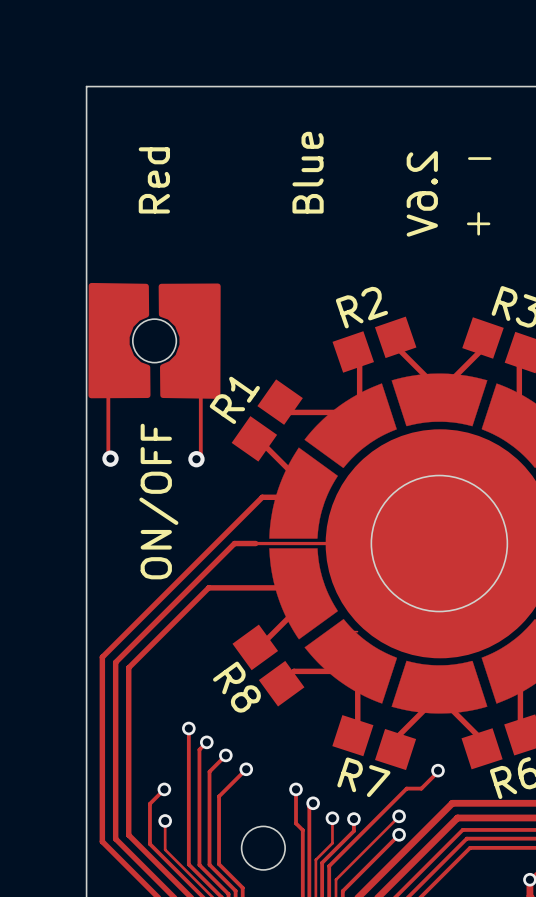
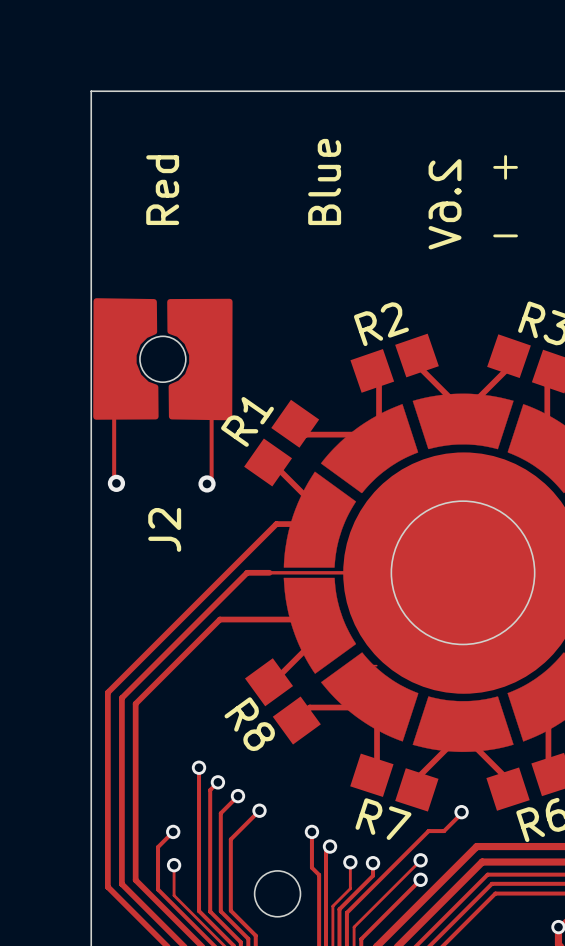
text: - (479, 158) -> + (505, 167)
text: + (478, 223) -> - (505, 235)
ON/OFF name: ON/OFF (158, 501) -> J2 (164, 529)

